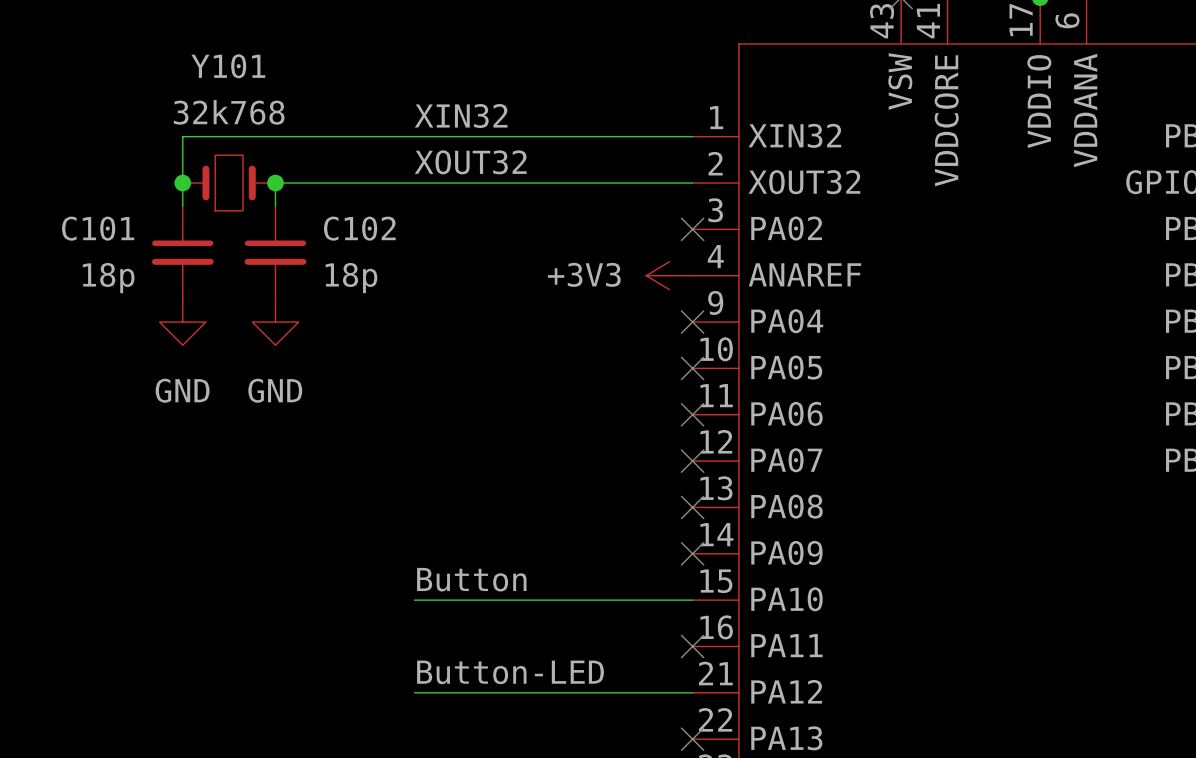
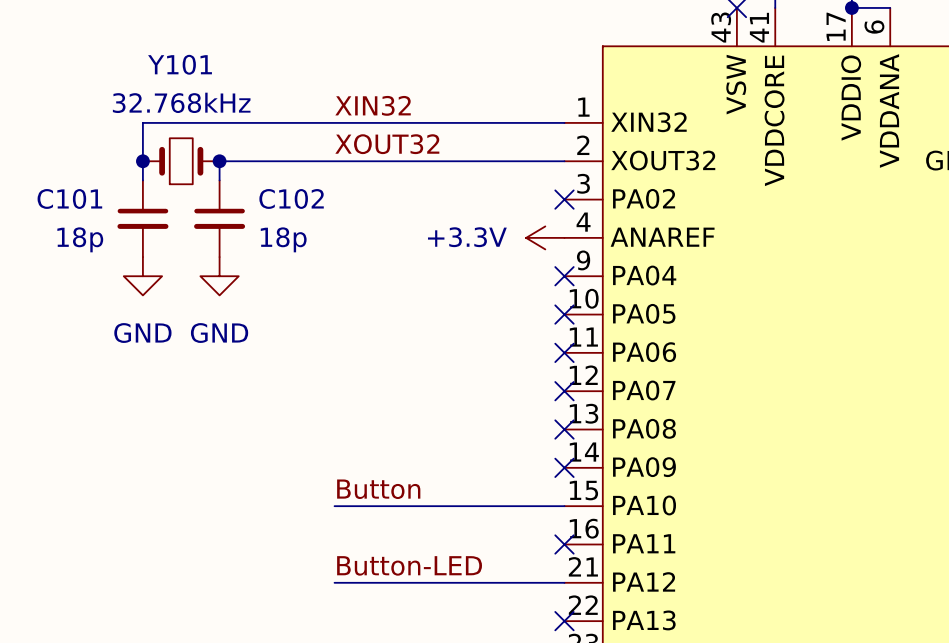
Y101 value: 32k768 (229, 112) -> 32.768kHz (181, 102)
power symbol: +3V3 (669, 275) -> +3.3V (545, 237)

